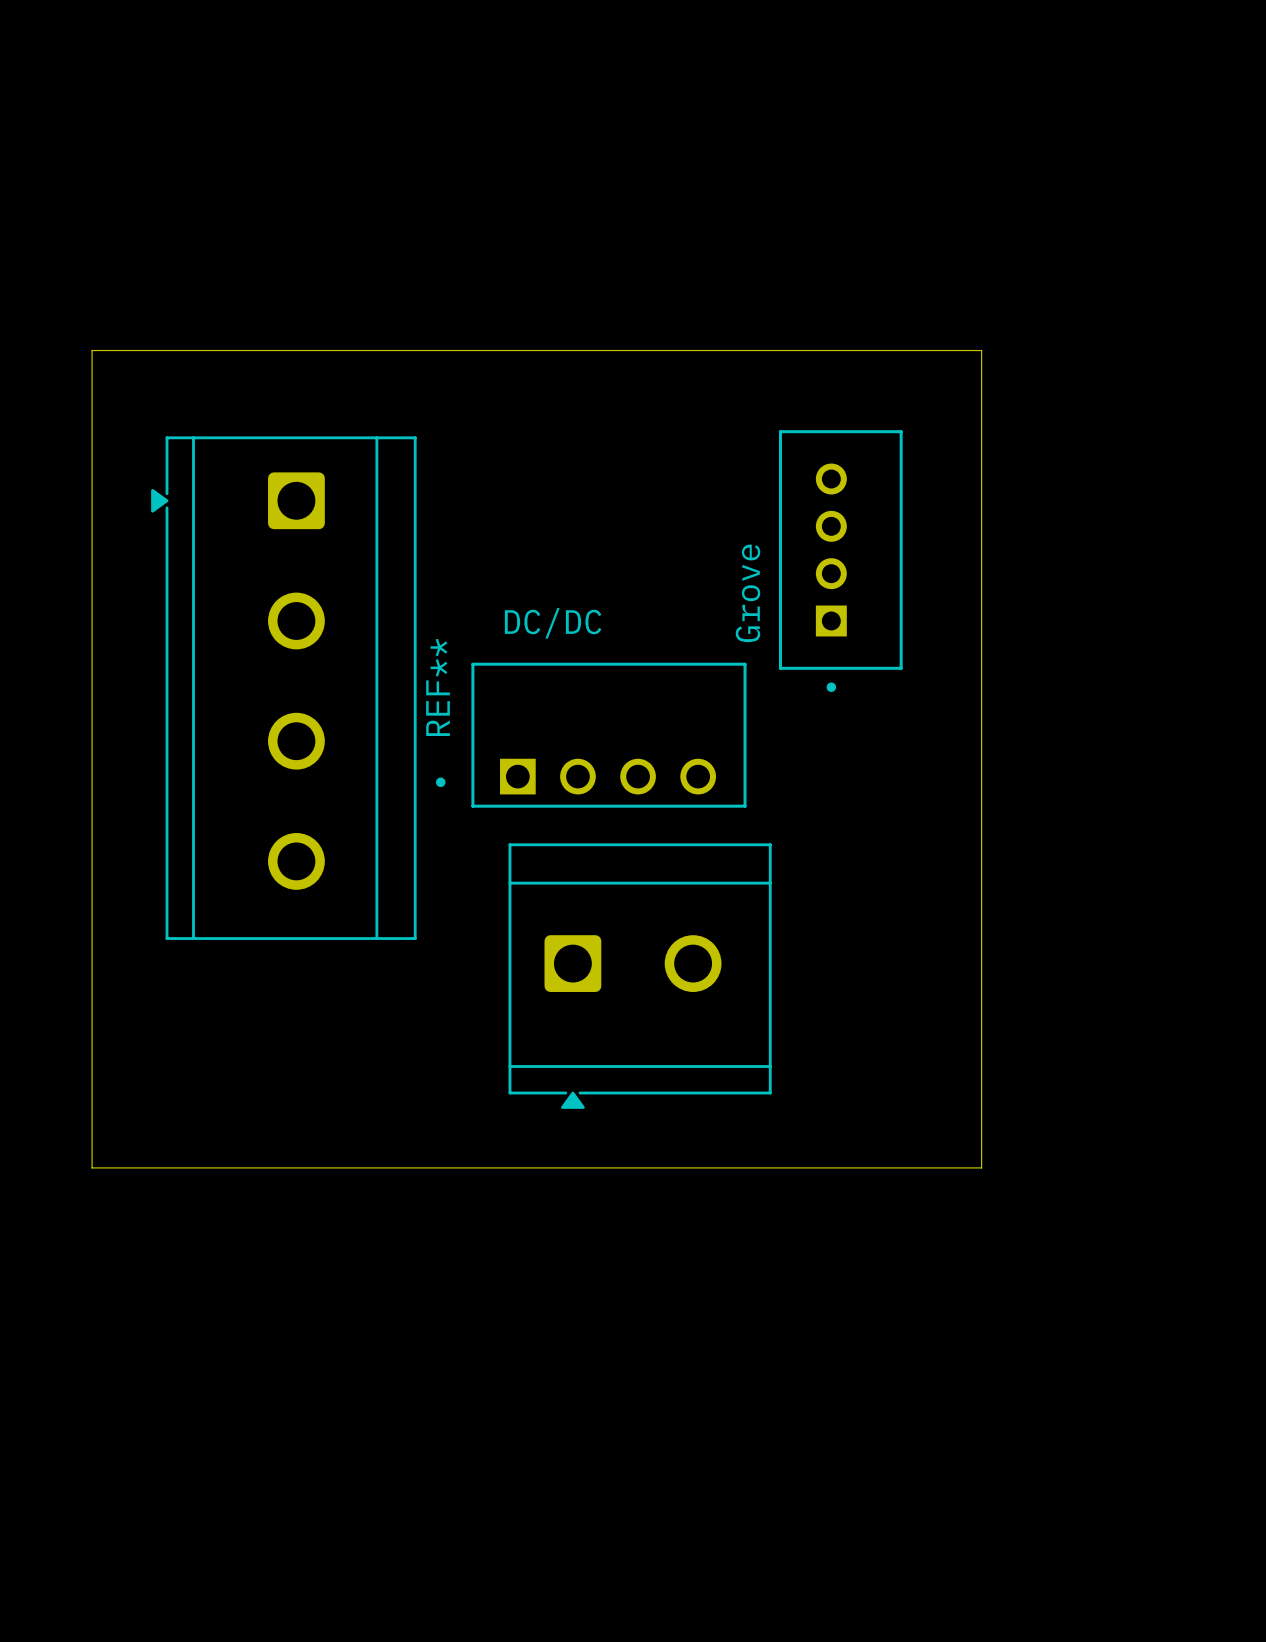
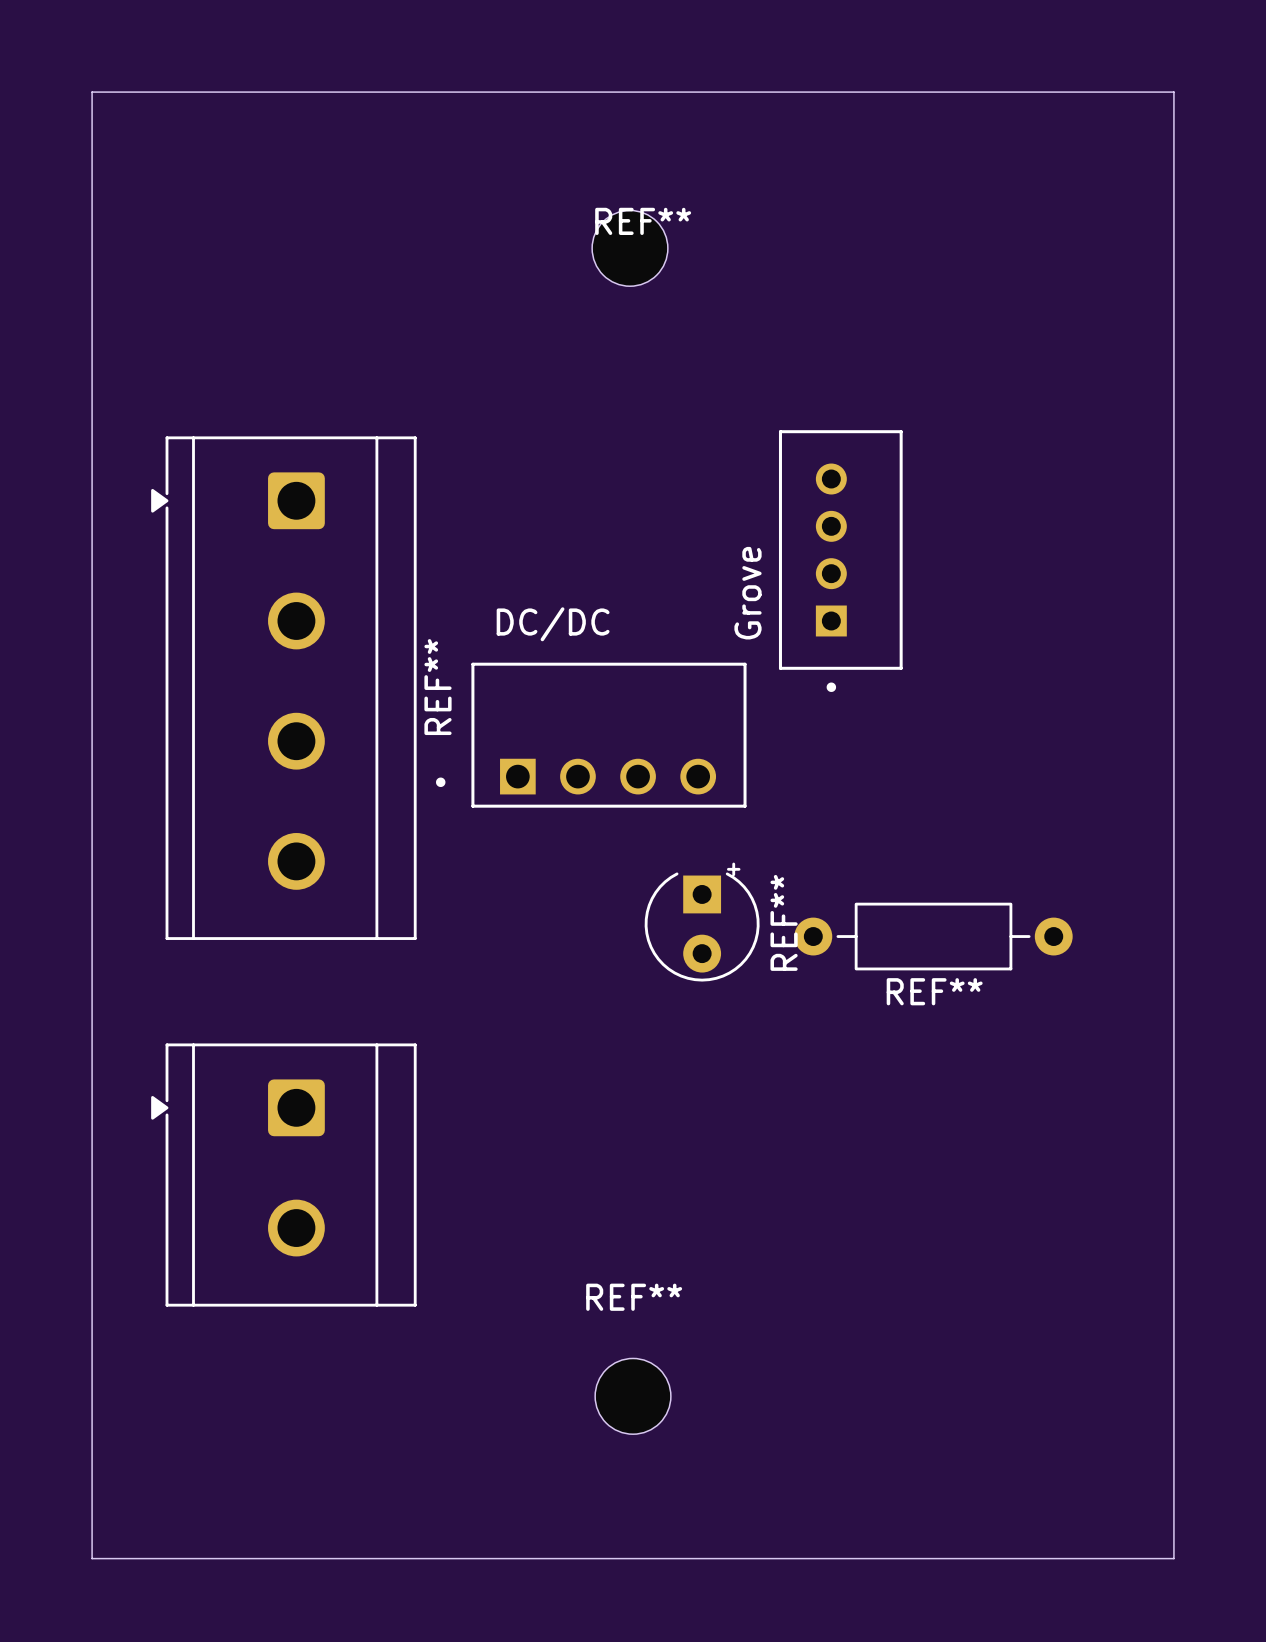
REF**: none -> (630, 248)
board edge: (92, 350) (981, 350) (981, 1167) (92, 1167) -> (92, 350) (92, 92) (1173, 92) (1173, 1558) (92, 1558) (92, 1167)
REF**: none -> (702, 922)
REF**: none -> (933, 936)
part rotation: 0° (640, 976) -> 90° clockwise (283, 1175)
part position: (640, 976) -> (283, 1175)
REF**: none -> (633, 1396)

